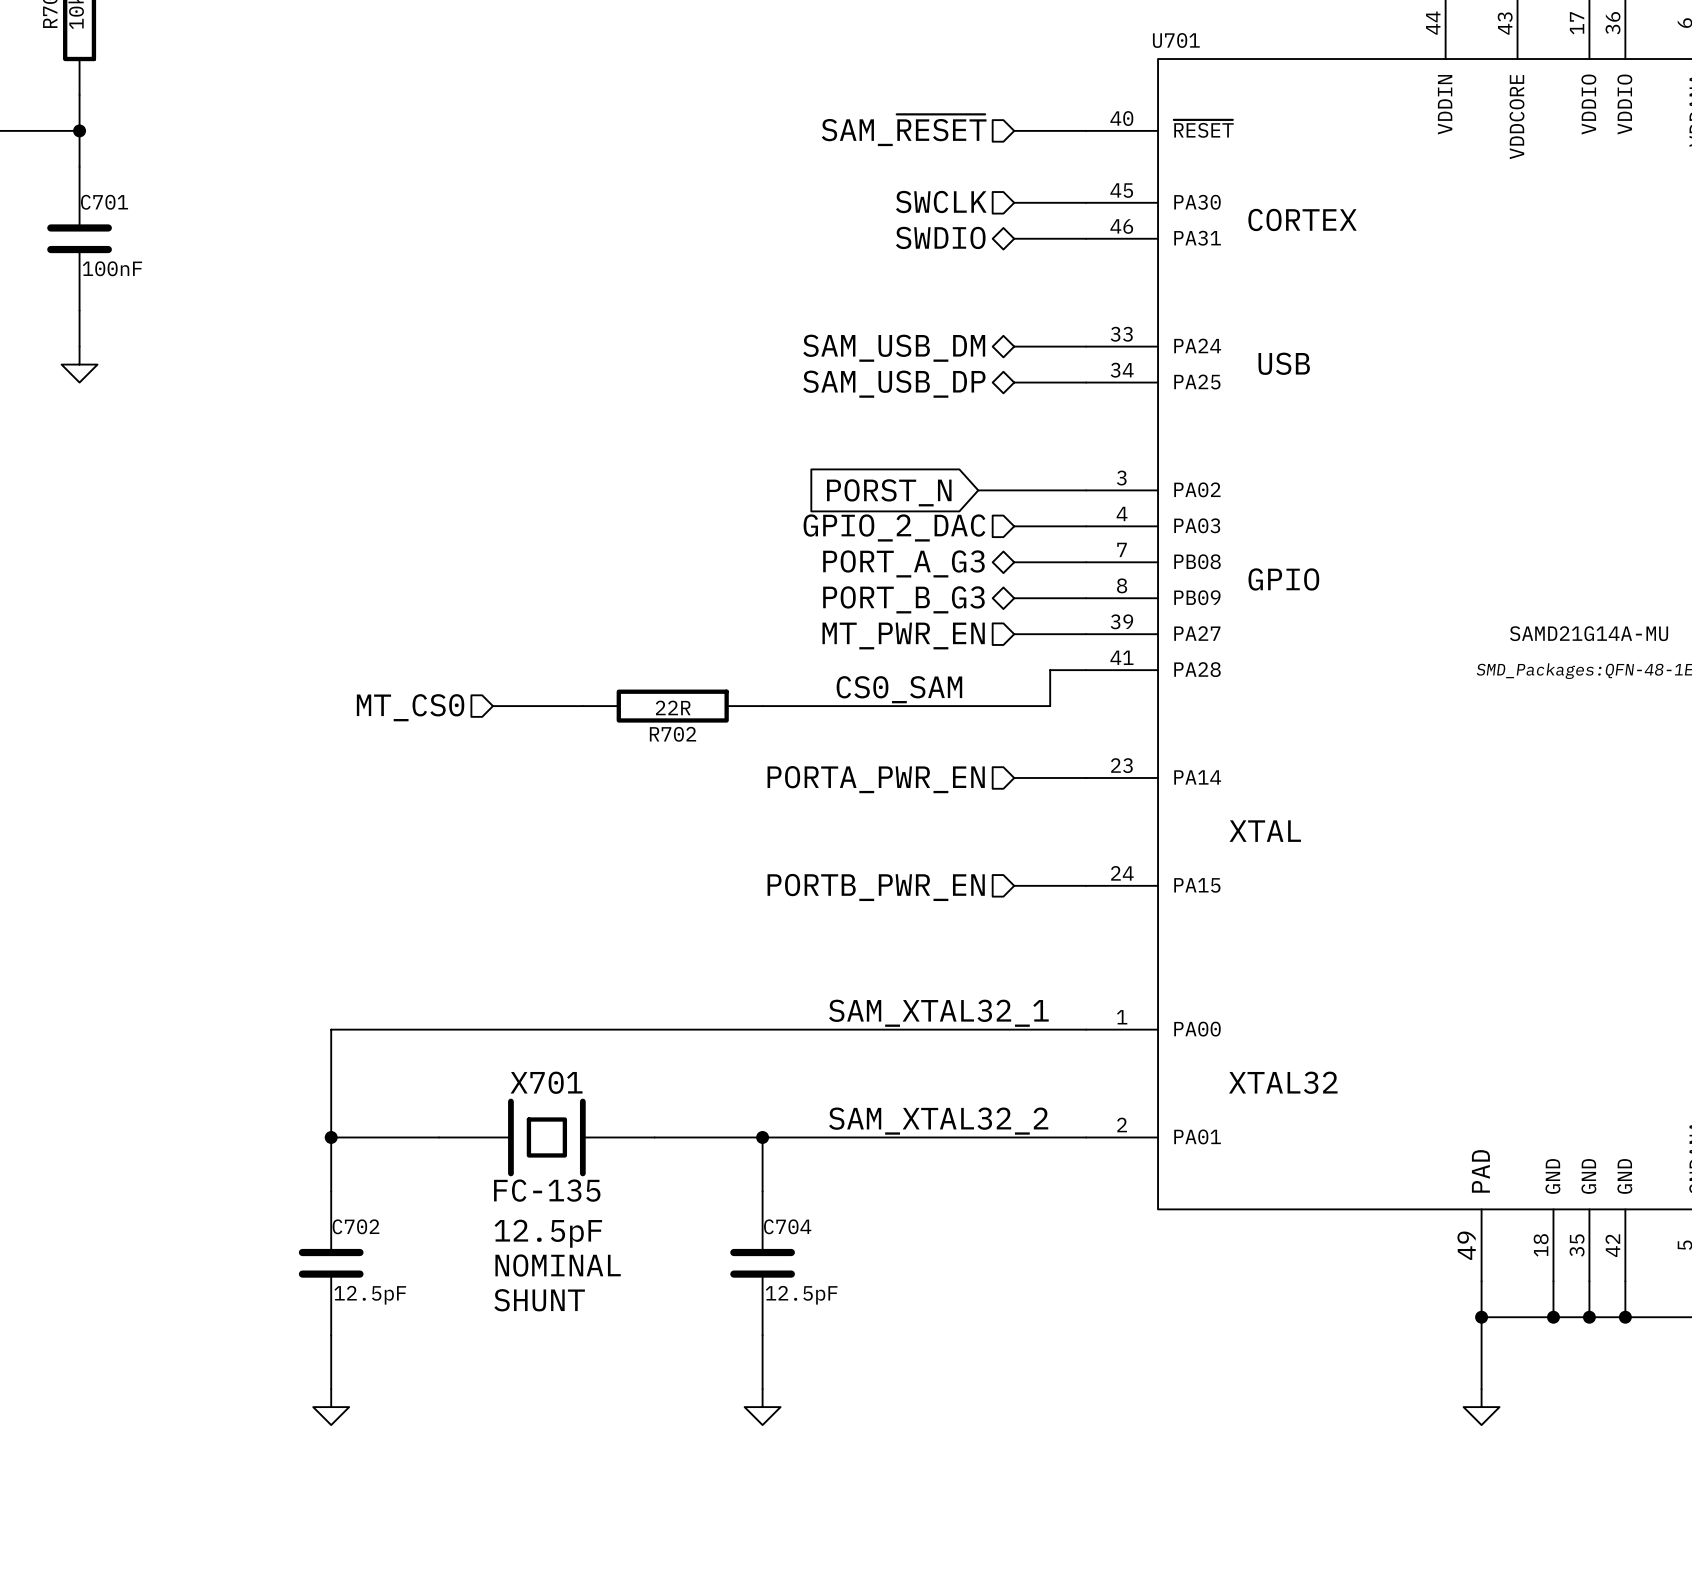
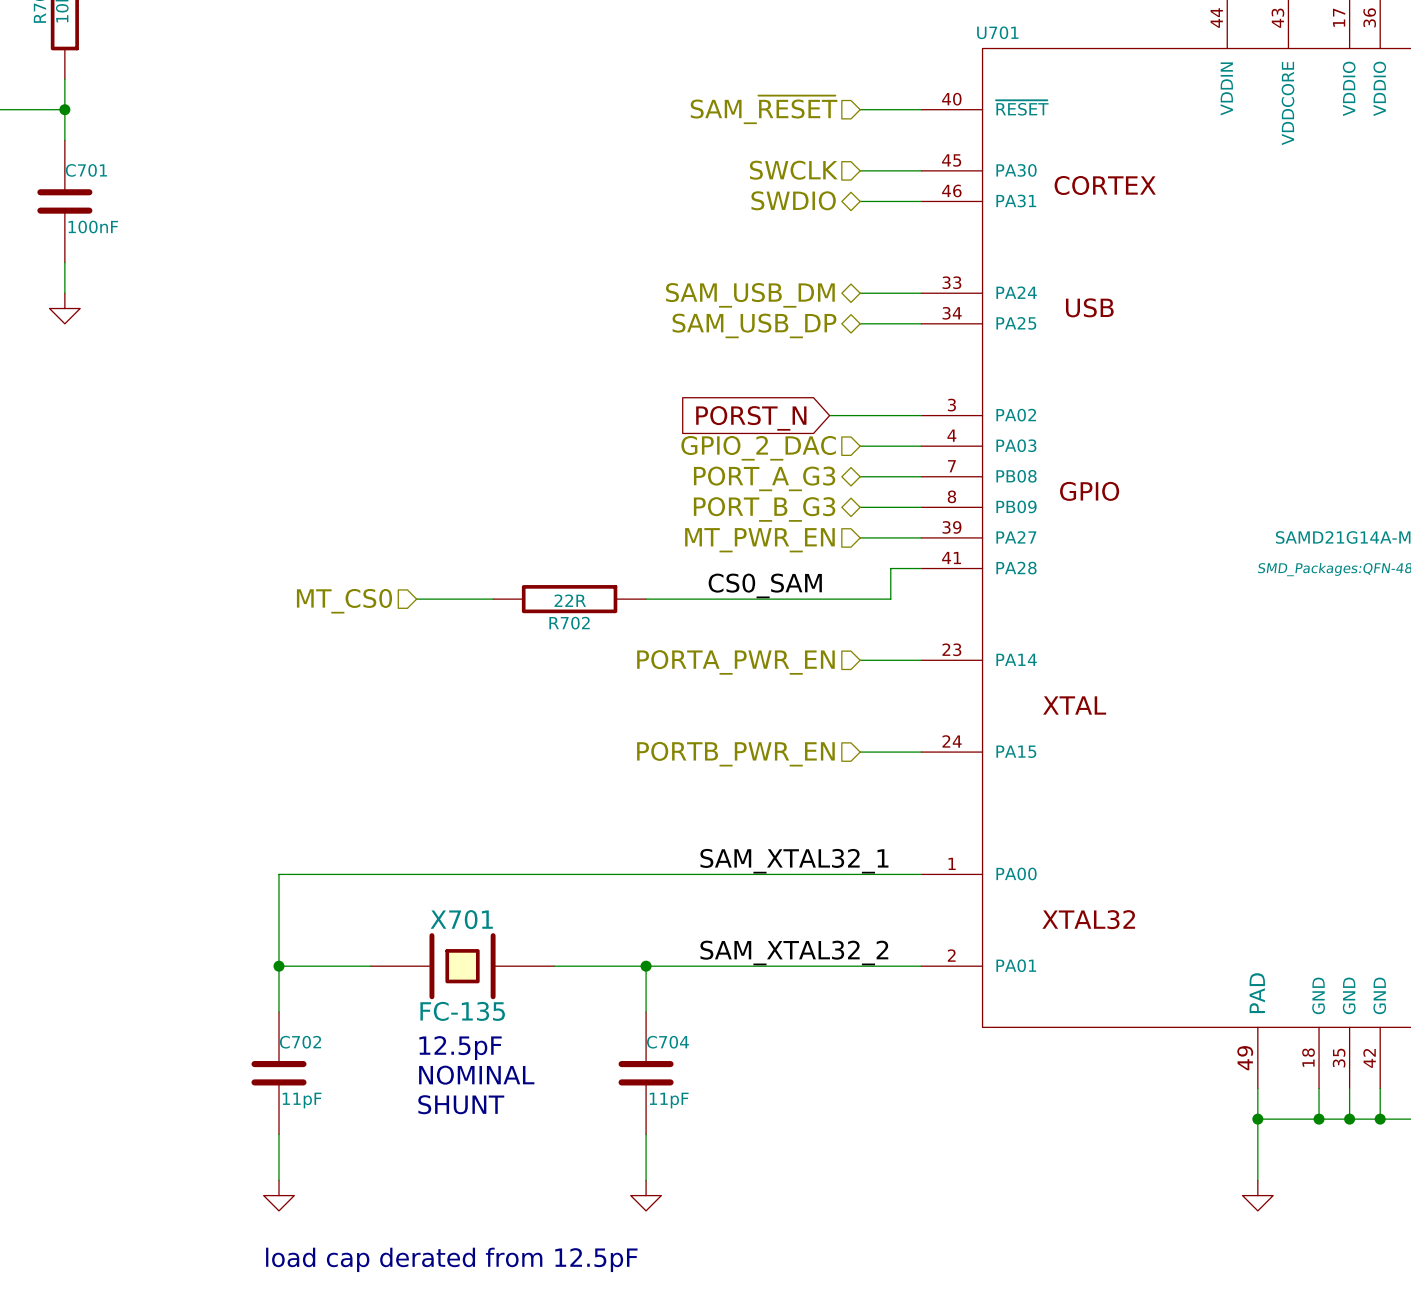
C702 value: 12.5pF (370, 1295) -> 11pF (302, 1100)
C704 value: 12.5pF (801, 1295) -> 11pF (669, 1100)
text: none -> load cap derated from 12.5pF (451, 1259)

